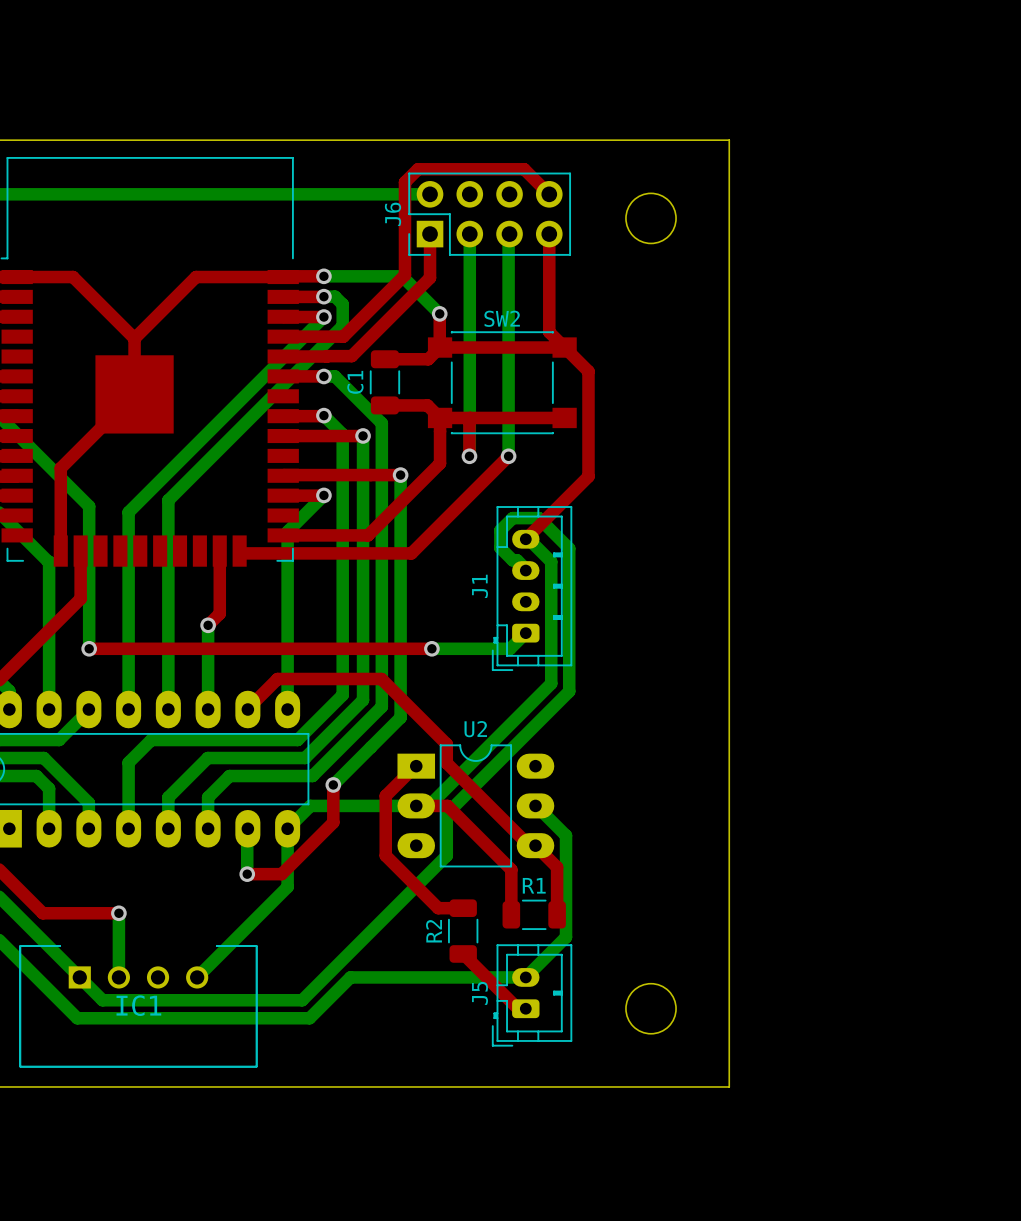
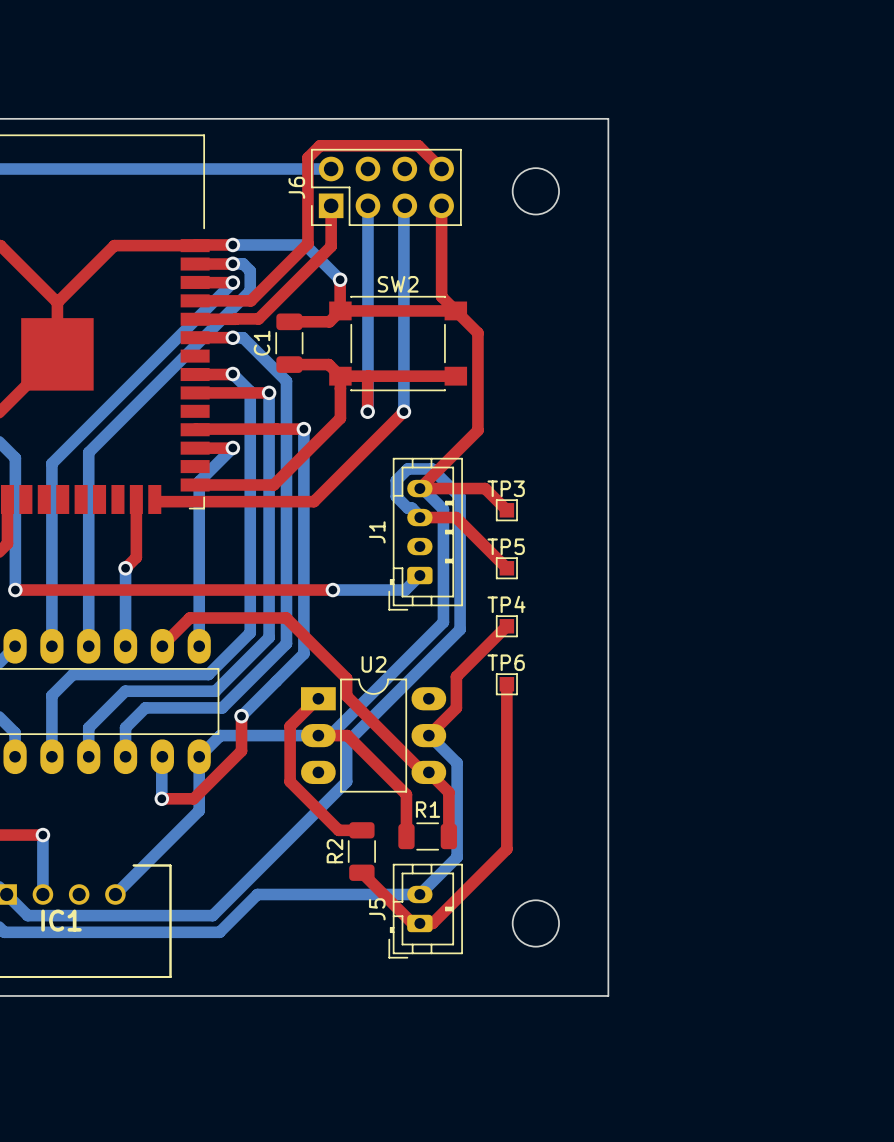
top track: none -> (419, 488) (485, 488) (506, 510)
TP3: none -> (506, 510)
top track: none -> (419, 517) (456, 517) (506, 568)
TP5: none -> (506, 568)
top track: none -> (506, 626) (456, 676) (456, 708) (428, 735)
TP4: none -> (506, 626)
top track: none -> (506, 684) (506, 849) (432, 923) (419, 923)
TP6: none -> (506, 684)

